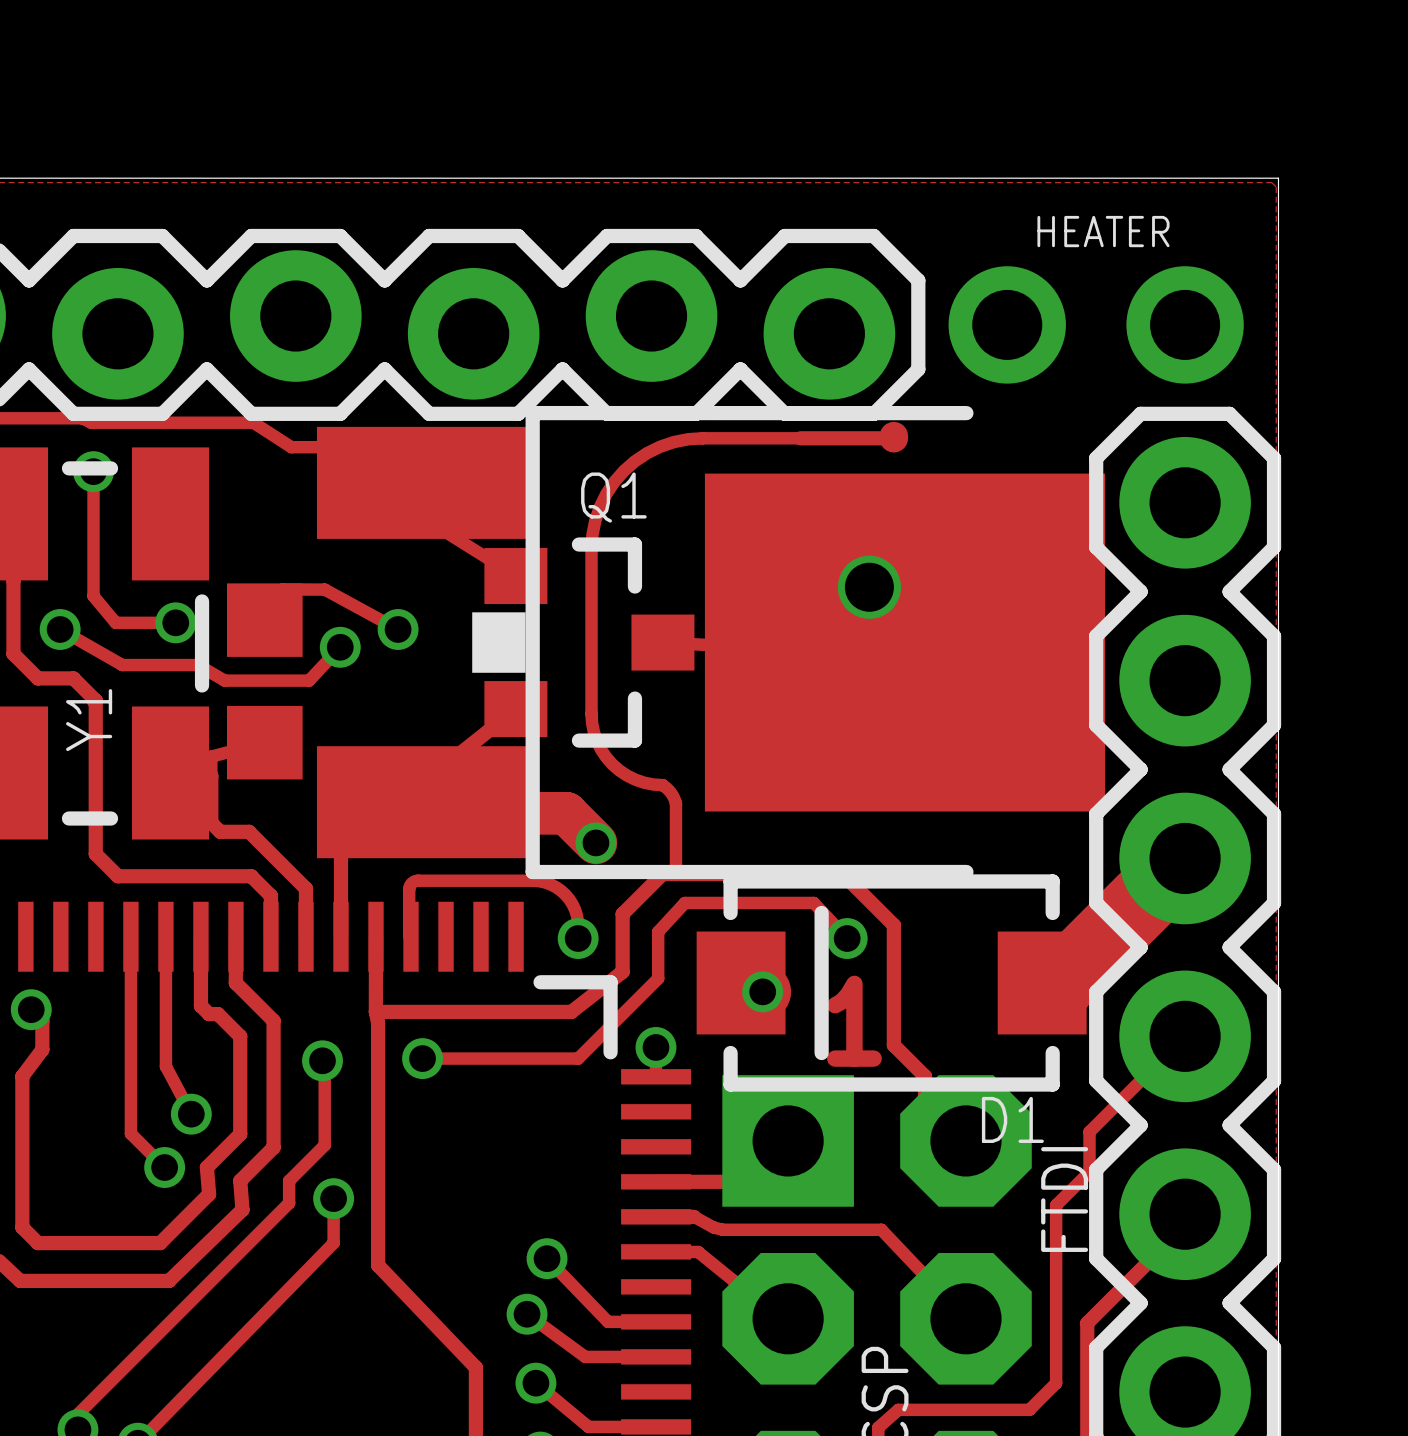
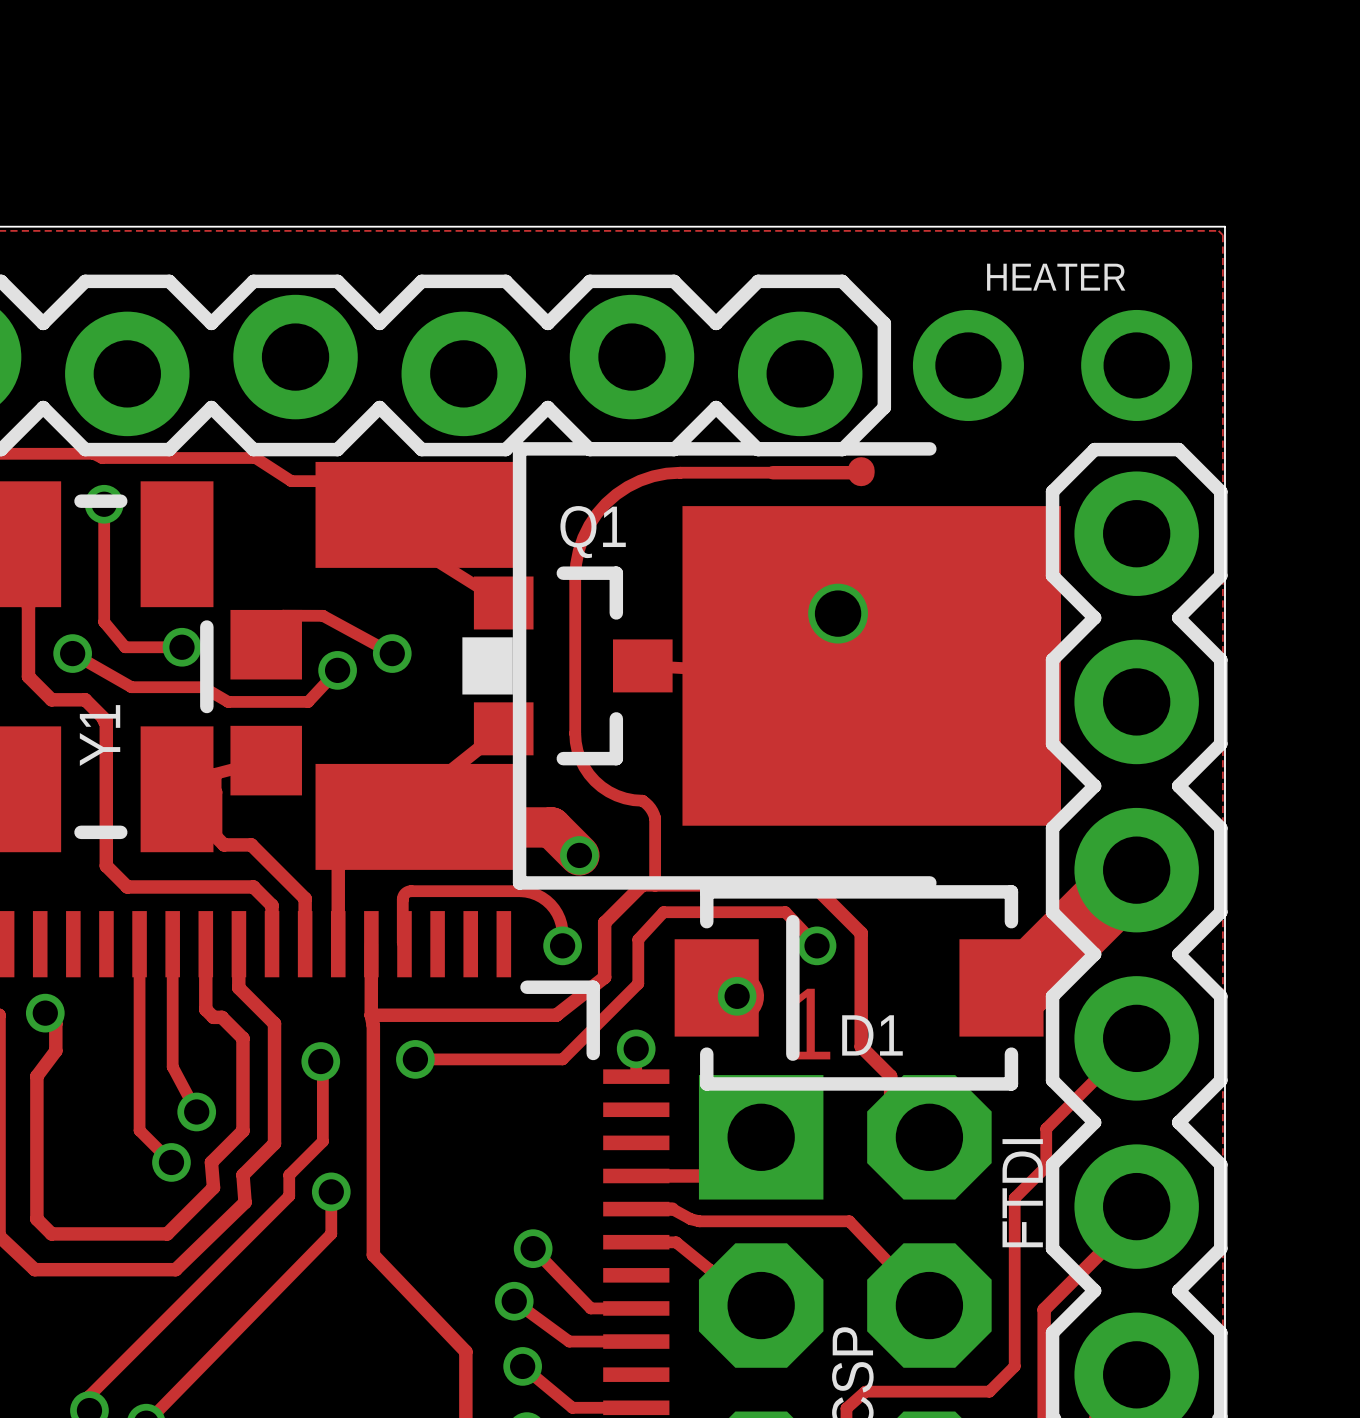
D1 name position: D1 (1012, 1119) -> D1 (872, 1035)

